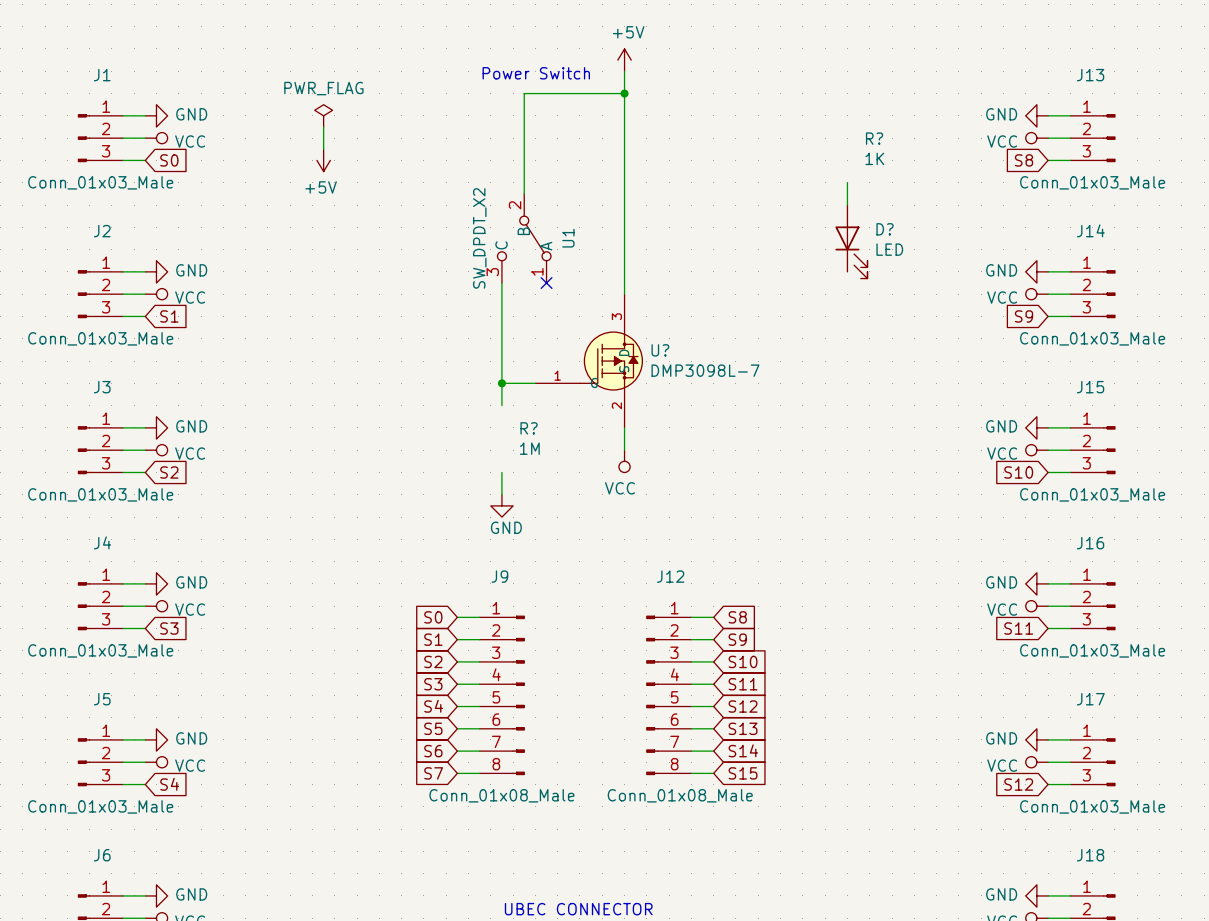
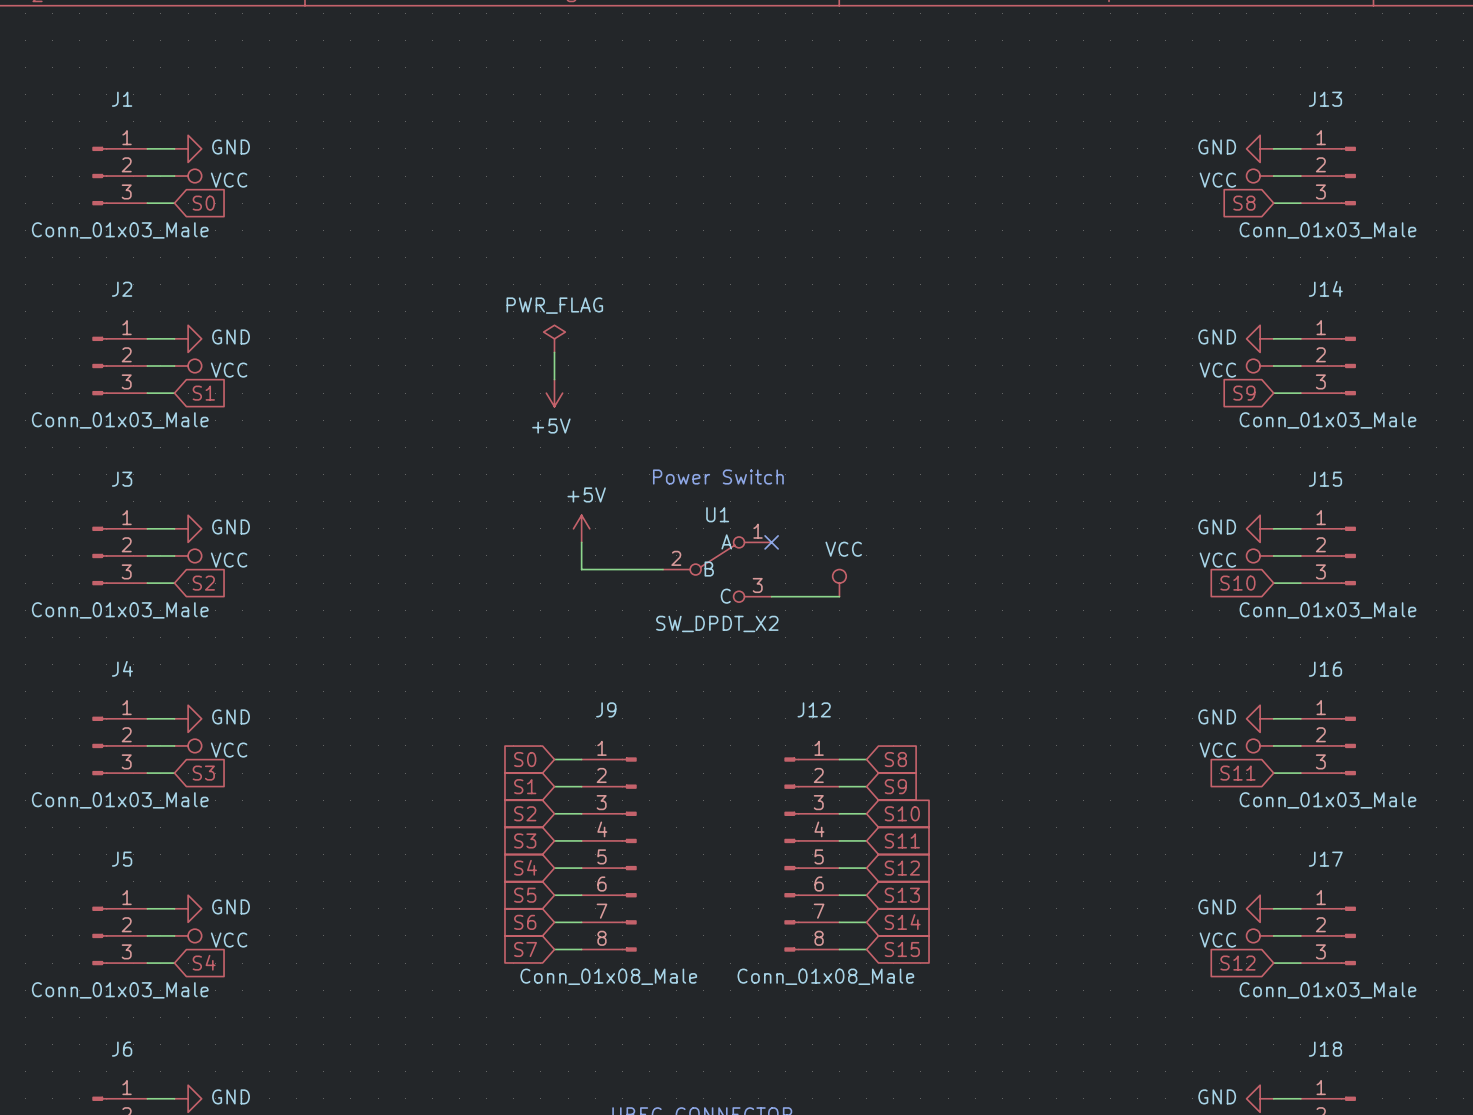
power symbol: +5V (624, 60) -> none
wire: (624, 71) (624, 294) -> none
text: Power Switch (536, 73) -> none
wire: (624, 93) (524, 93) (524, 193) -> none
junction: (624, 93) -> none
power symbol position: PWR_FLAG (323, 115) -> PWR_FLAG (554, 338)
wire: (323, 127) (323, 149) -> none
R?: 1K (874, 148) -> none
power symbol: +5V (323, 160) -> none
wire: (847, 182) (847, 205) -> none
U1 rotation: 0° (524, 238) -> 90° counterclockwise (717, 569)
U1 position: (524, 238) -> (717, 569)
D?: LED (851, 241) -> none
wire: (501, 283) (501, 405) -> none
no-connect mark: (546, 283) -> none
power symbol: none -> +5V (554, 393)
U?: DMP3098L-7 (588, 361) -> none
wire: (501, 383) (535, 383) -> none
junction: (501, 383) -> none
text: none -> Power Switch (718, 477)
power symbol: none -> +5V (581, 528)
wire: (624, 427) (624, 450) -> none
R?: 1M (529, 438) -> none
wire: none -> (581, 542) (581, 569) (663, 569)
no-connect mark: none -> (771, 542)
power symbol rotation: 0° (624, 461) -> 180° (839, 583)
power symbol position: VCC (624, 461) -> VCC (839, 583)
wire: (501, 472) (501, 494) -> (554, 352) (554, 379)
wire: none -> (771, 596) (839, 596)
power symbol: GND (501, 505) -> none

